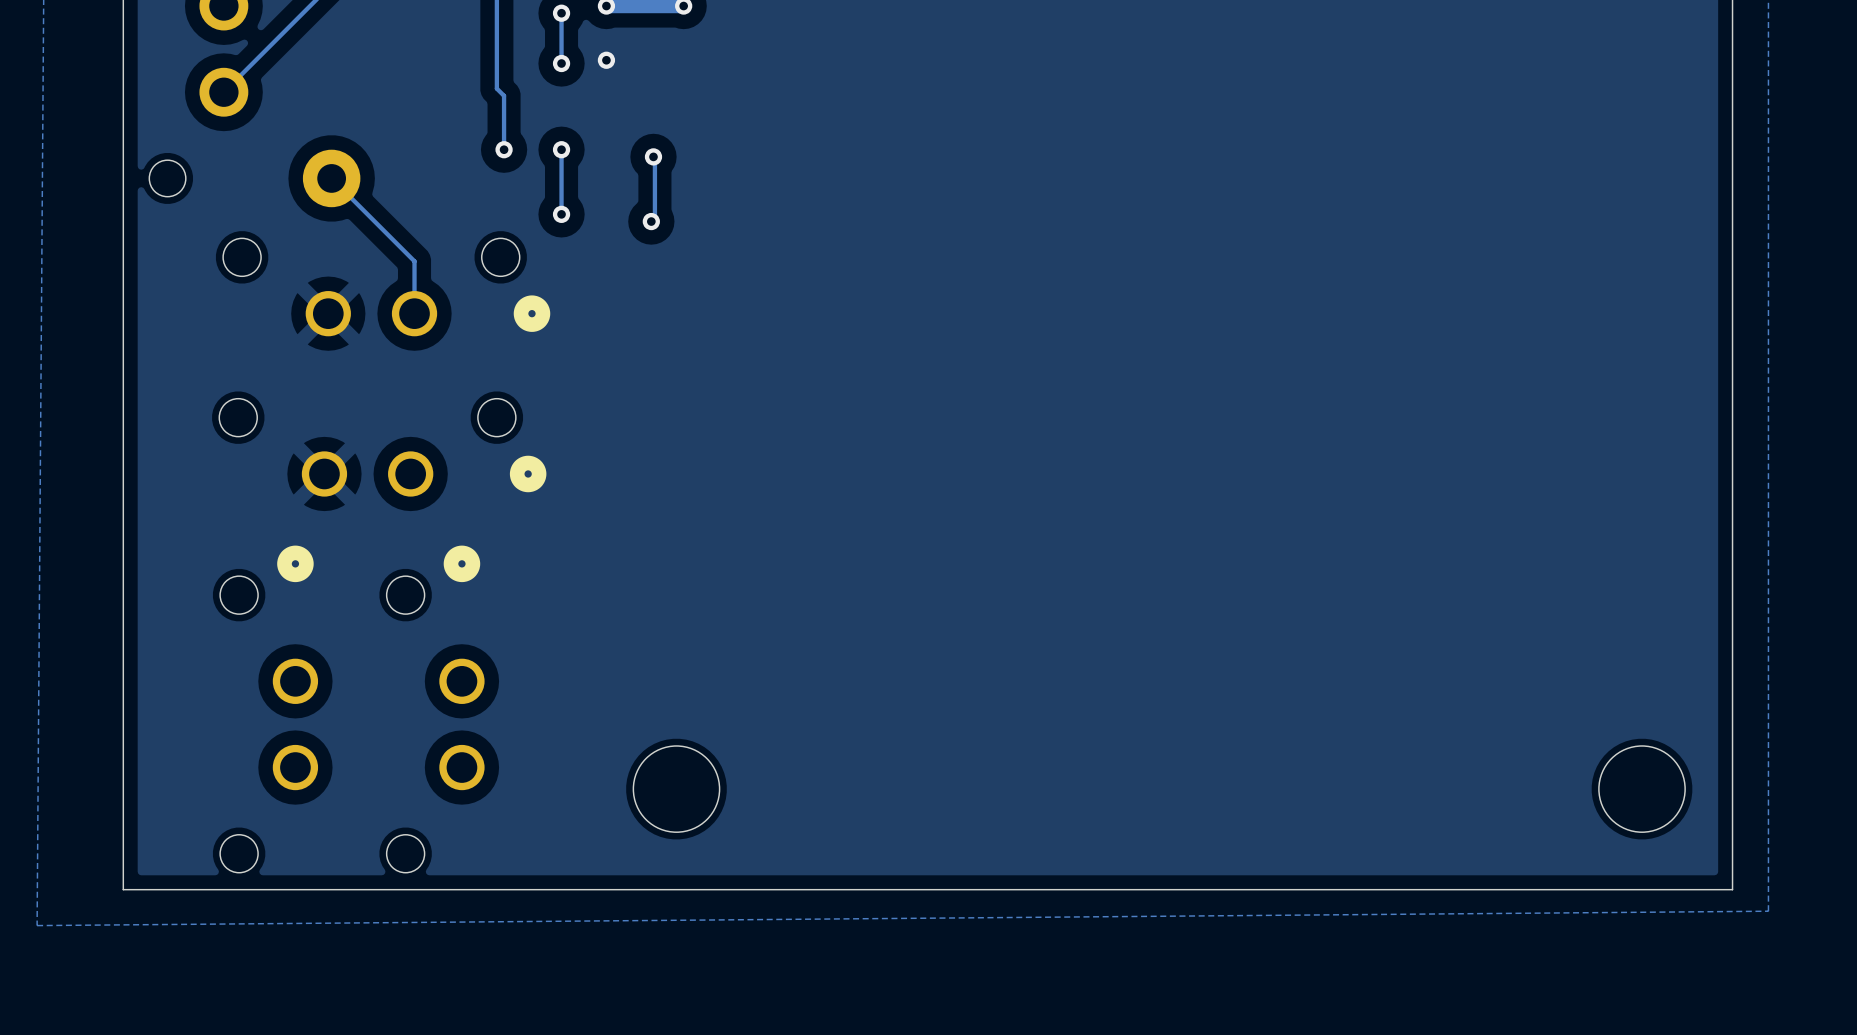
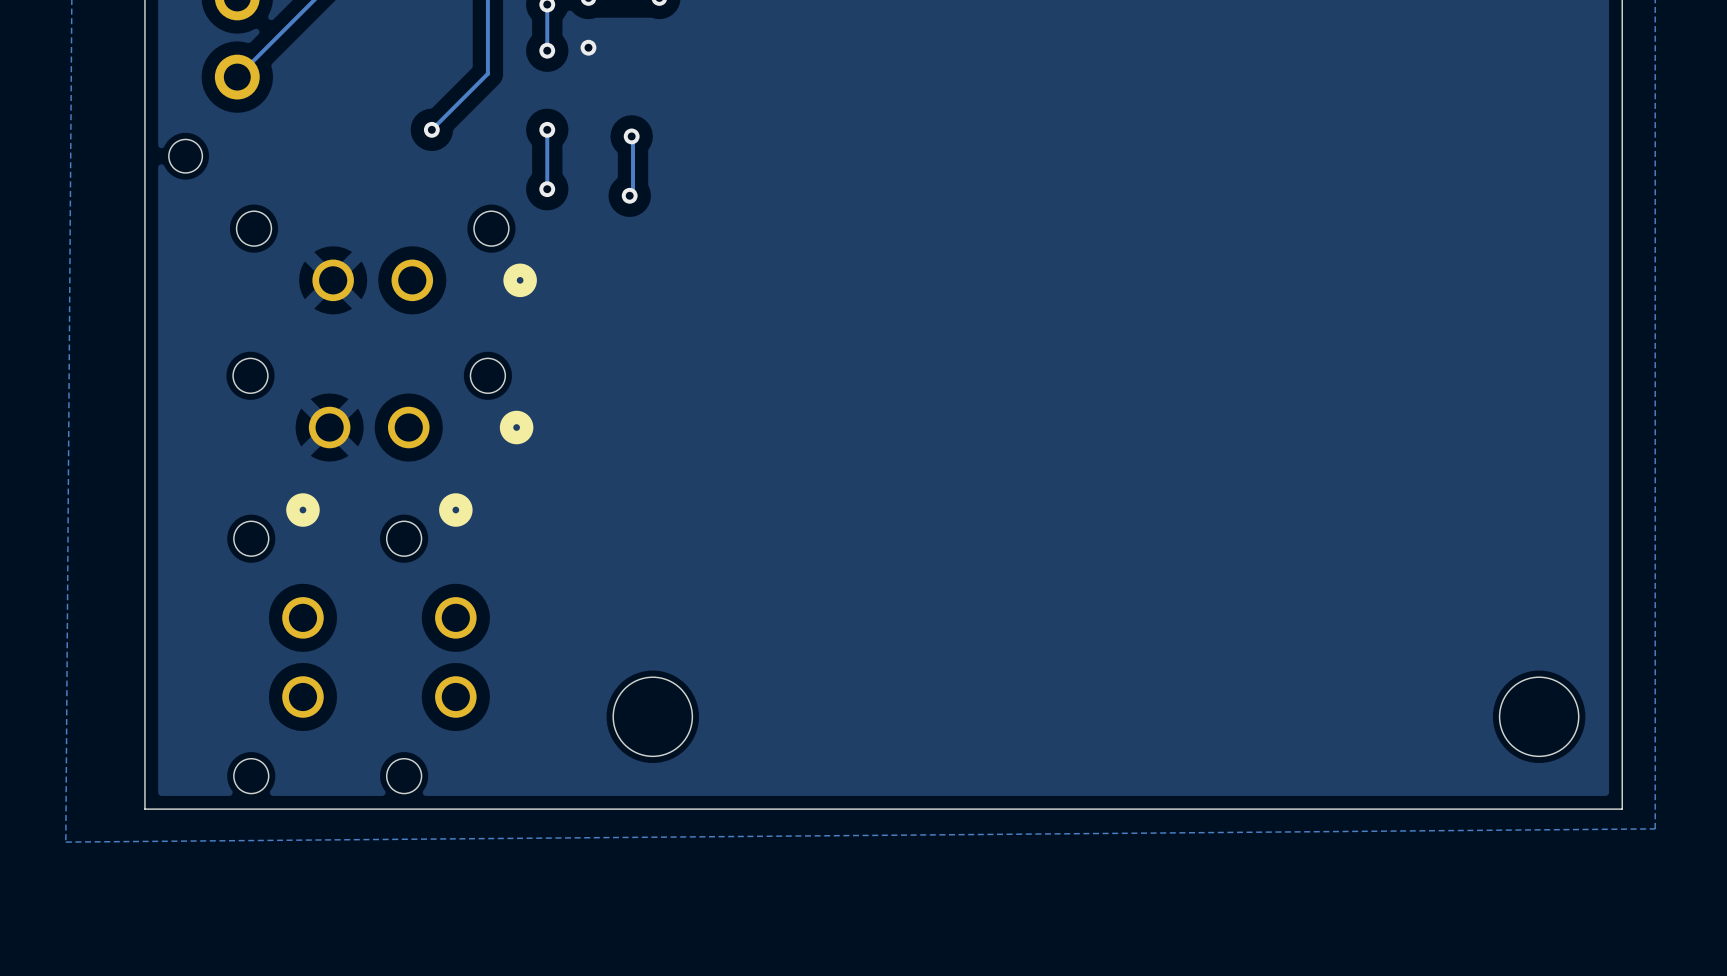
track: (496, 88) (504, 95) (504, 149) -> (487, 73) (431, 129)
via position: (504, 149) -> (431, 129)
track: (331, 178) (414, 261) (414, 313) -> none
part: (331, 178) -> none

